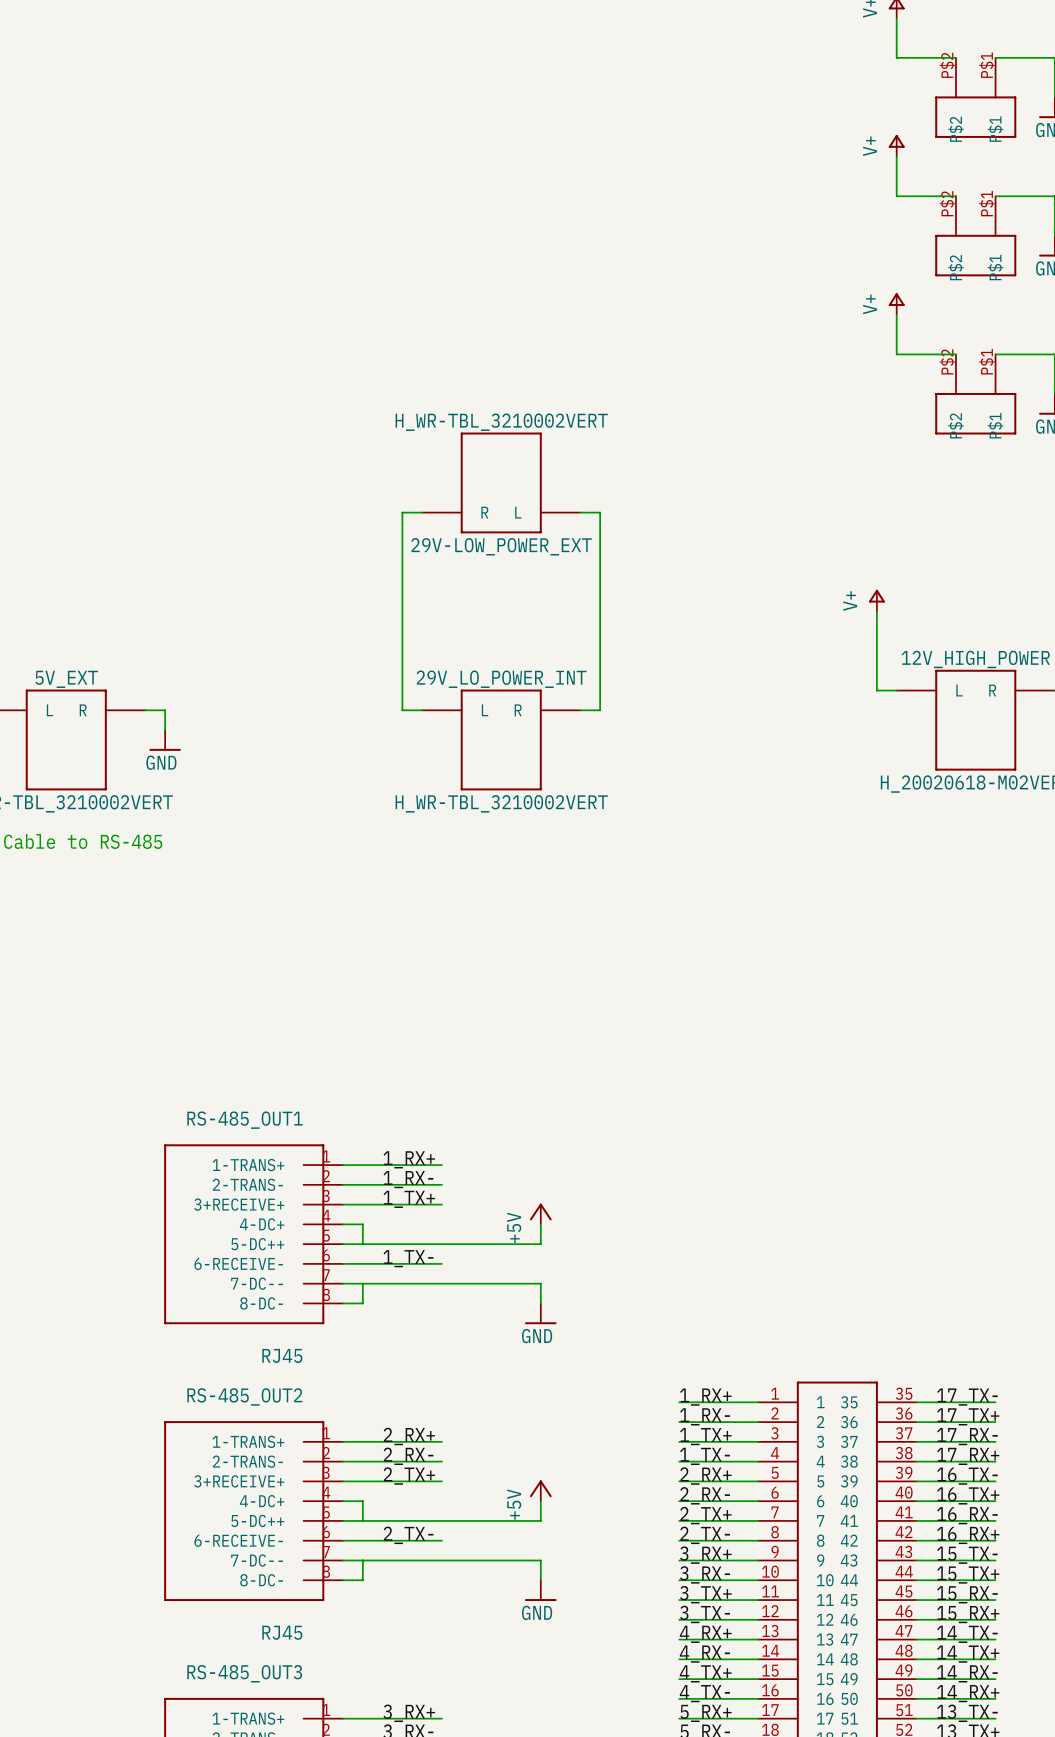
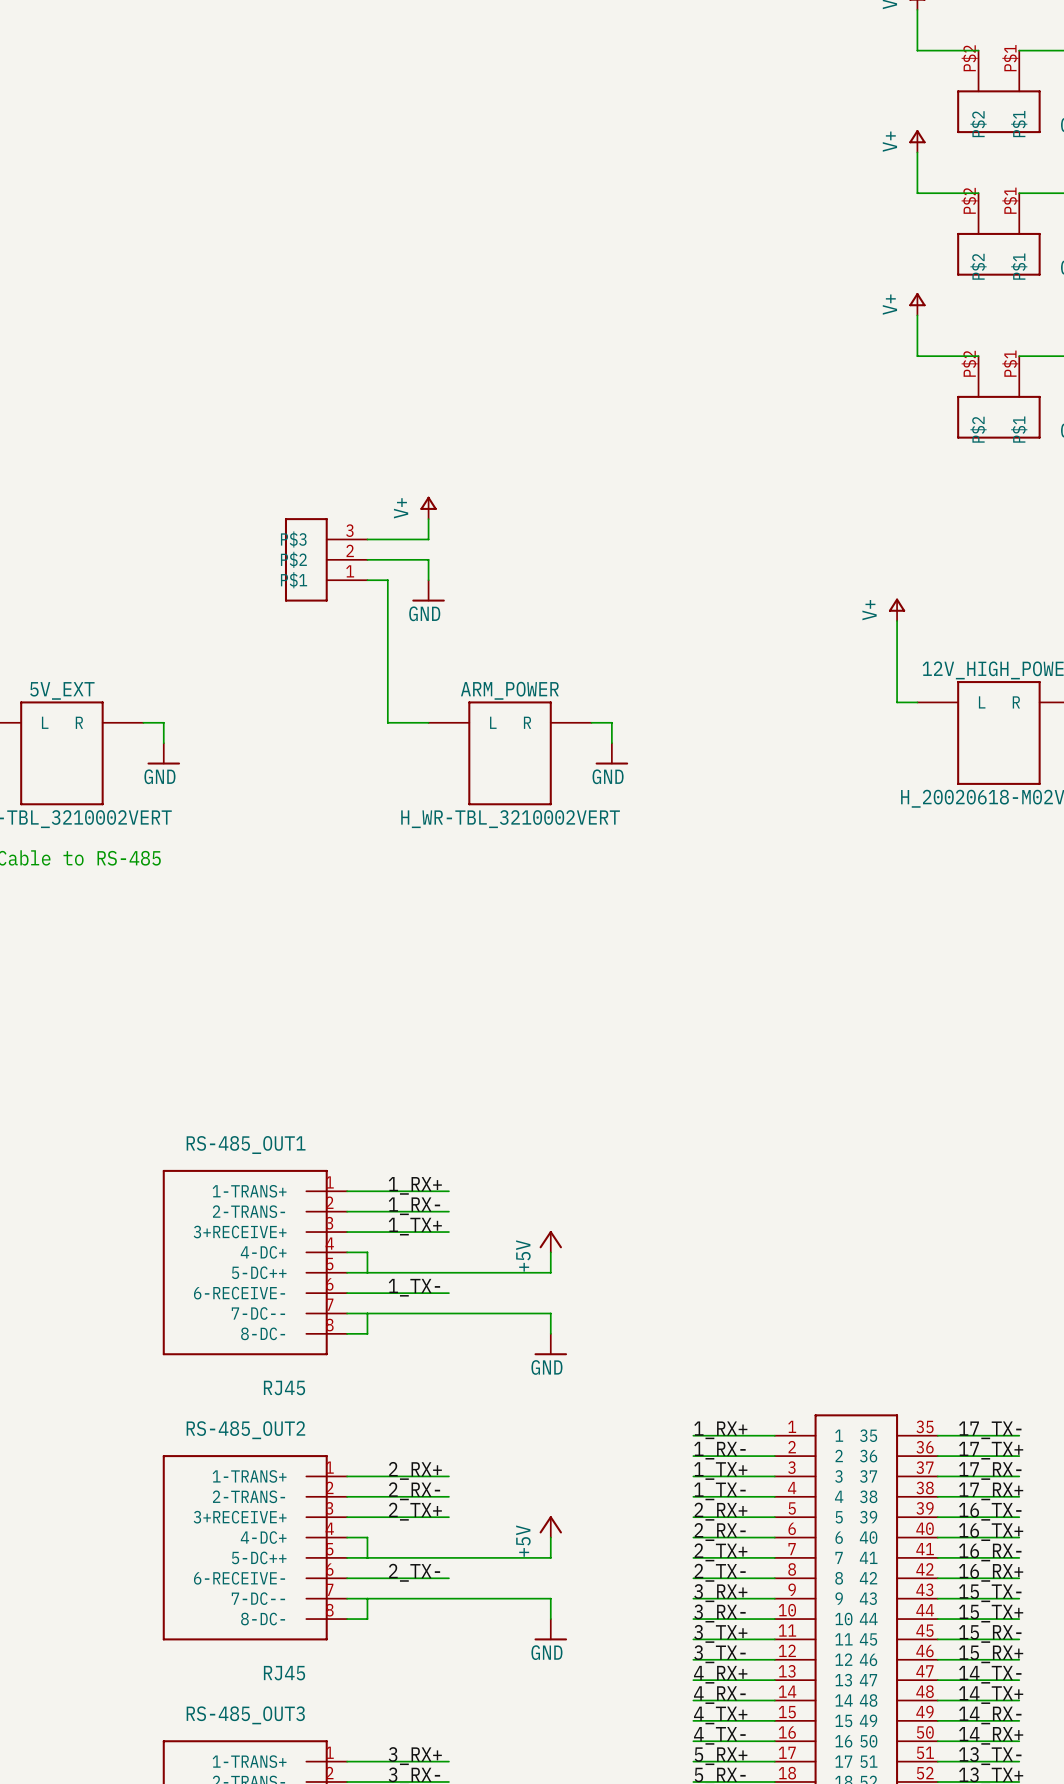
29V-LOW_POWER_EXT: H_WR-TBL_3210002VERT (501, 482) -> none
power symbol: none -> V+ (428, 507)
wire: (422, 512) (402, 512) (402, 710) -> (367, 580) (387, 580) (387, 722) (408, 722)
wire: none -> (428, 519) (428, 539) (367, 539)
wire: (580, 512) (600, 512) (600, 710) -> (611, 743) (611, 722)
part: none -> (326, 559)
wire: none -> (367, 559) (428, 559) (428, 580)
power symbol: none -> GND (428, 590)
29V_LO_POWER_INT name: 29V_LO_POWER_INT (501, 679) -> ARM_POWER (509, 690)
power symbol: none -> GND (611, 753)

